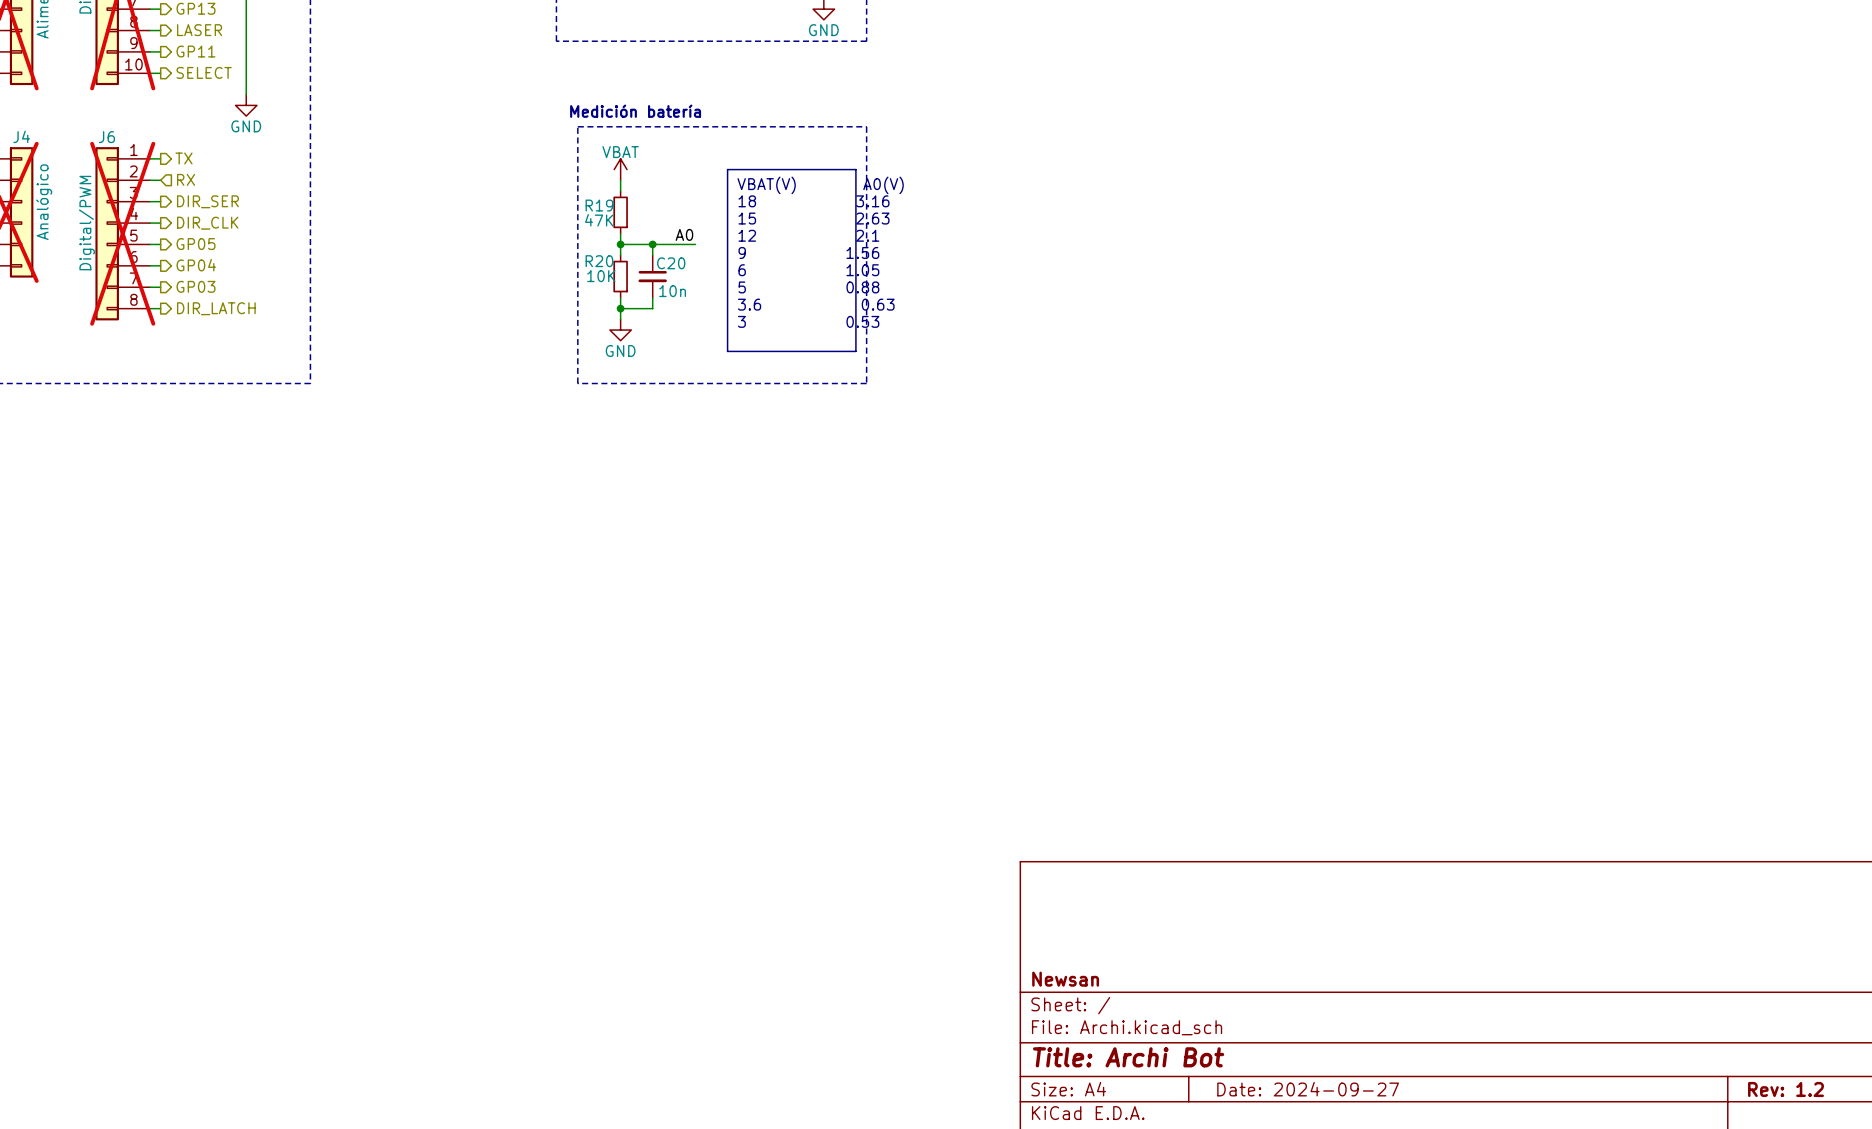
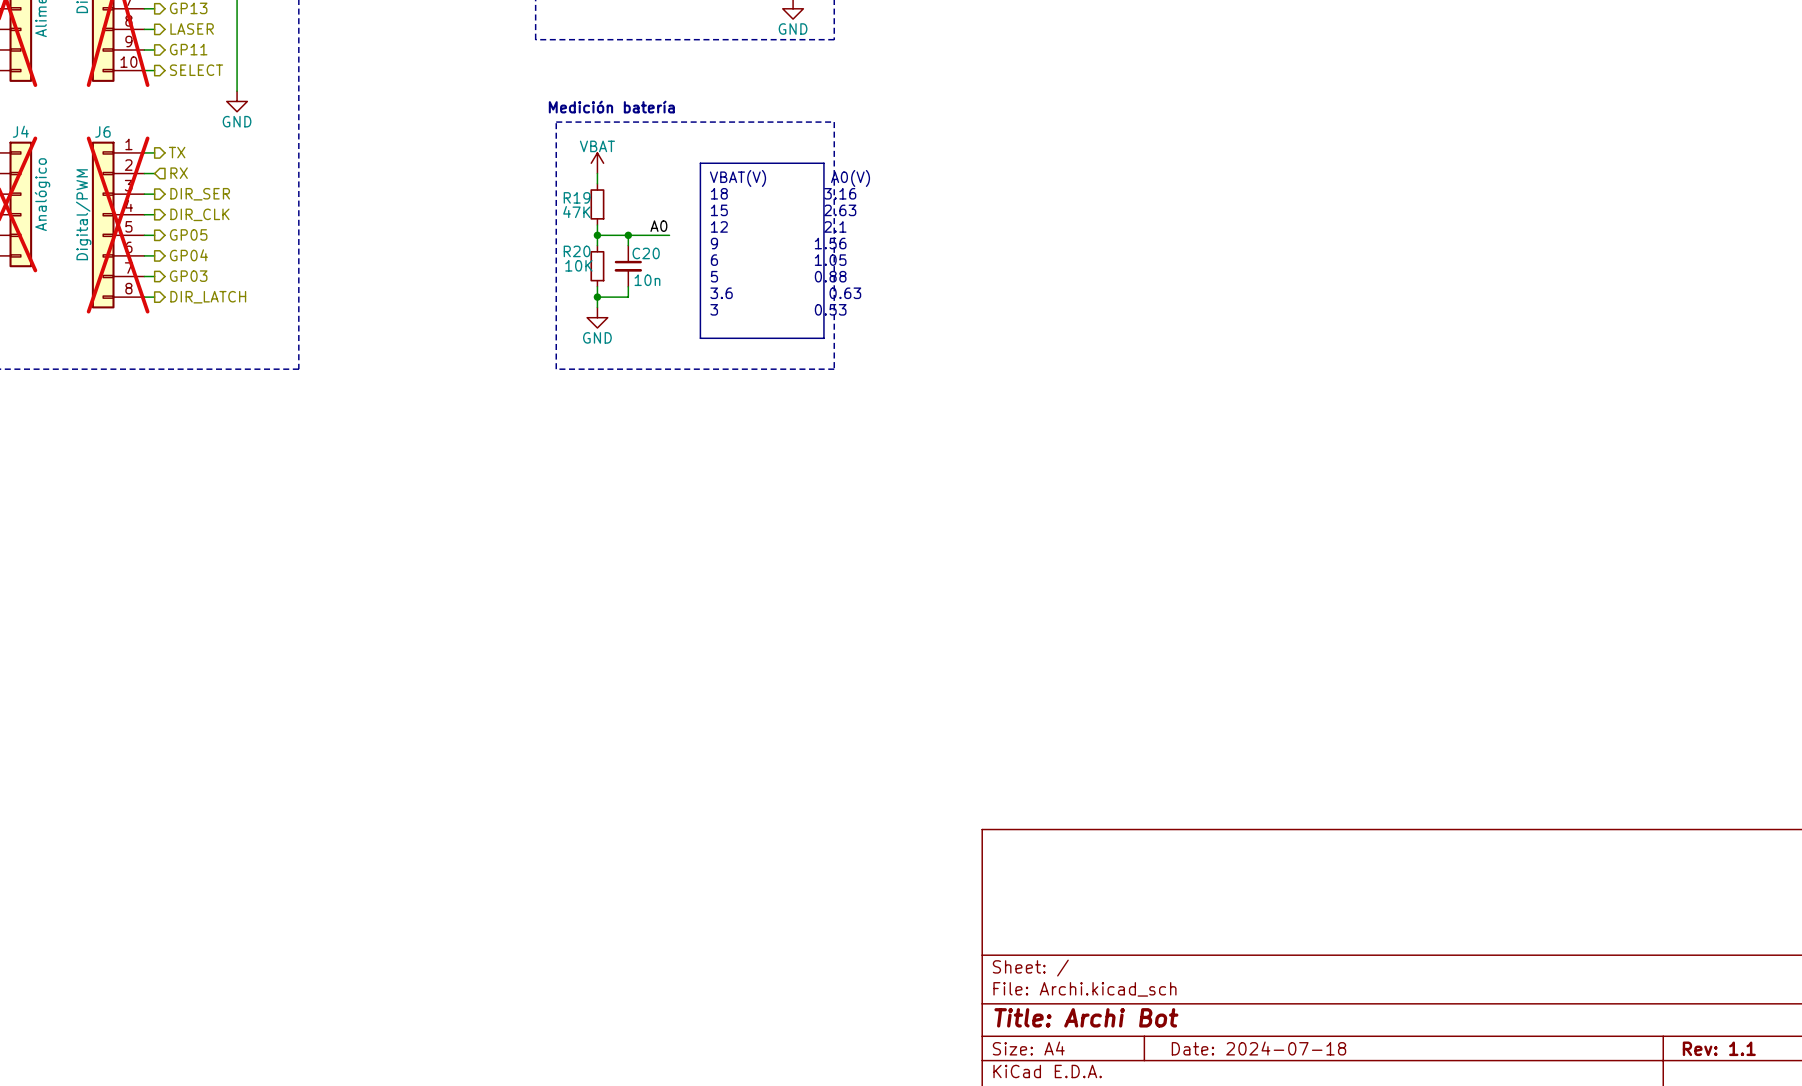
title block: Newsan (1065, 979) -> none
title block: Date: 2024-09-27 (1308, 1089) -> Date: 2024-07-18 (1258, 1048)
title block: Rev: 1.2 (1786, 1089) -> Rev: 1.1 (1719, 1048)

